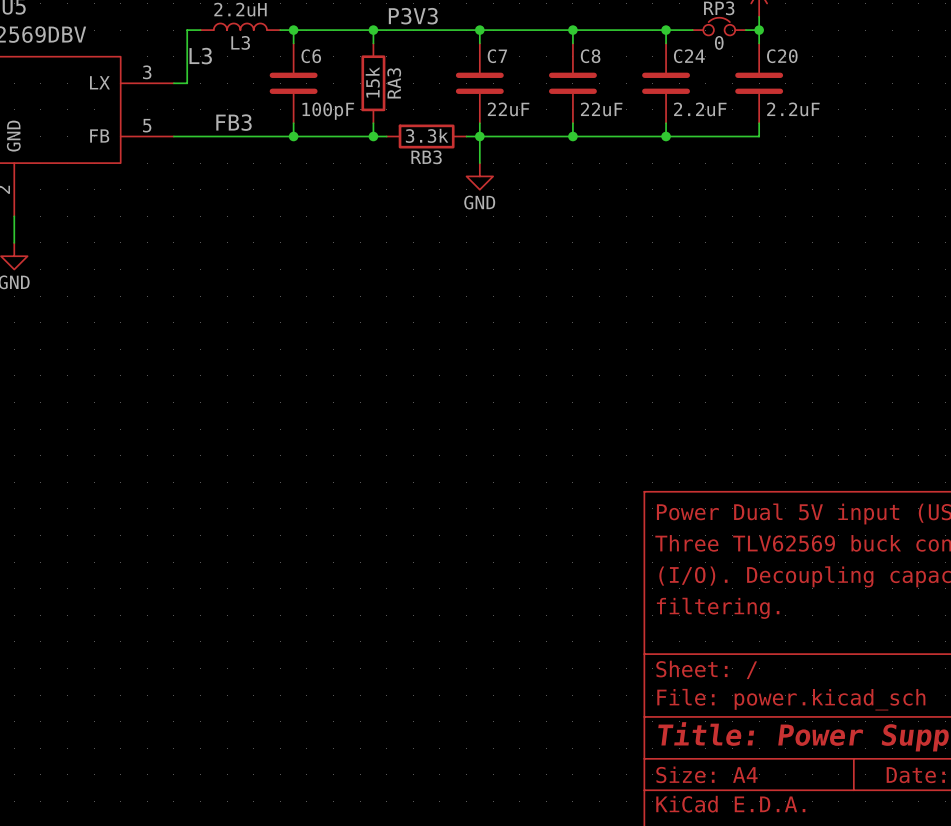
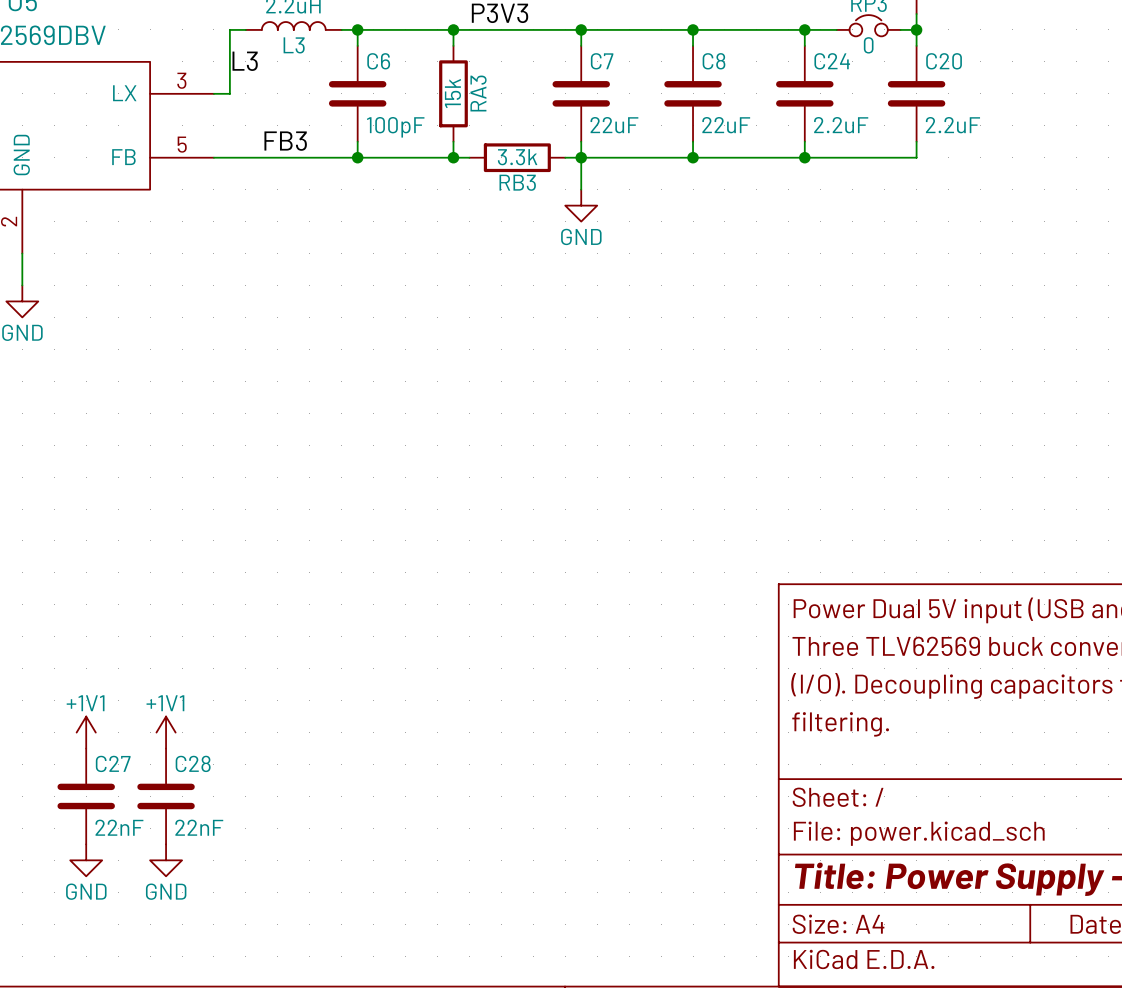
power symbol: none -> +1V1 (86, 732)
power symbol: none -> +1V1 (166, 732)
C27: none -> 22nF (86, 796)
C28: none -> 22nF (166, 796)
power symbol: none -> GND (86, 860)
power symbol: none -> GND (166, 860)

